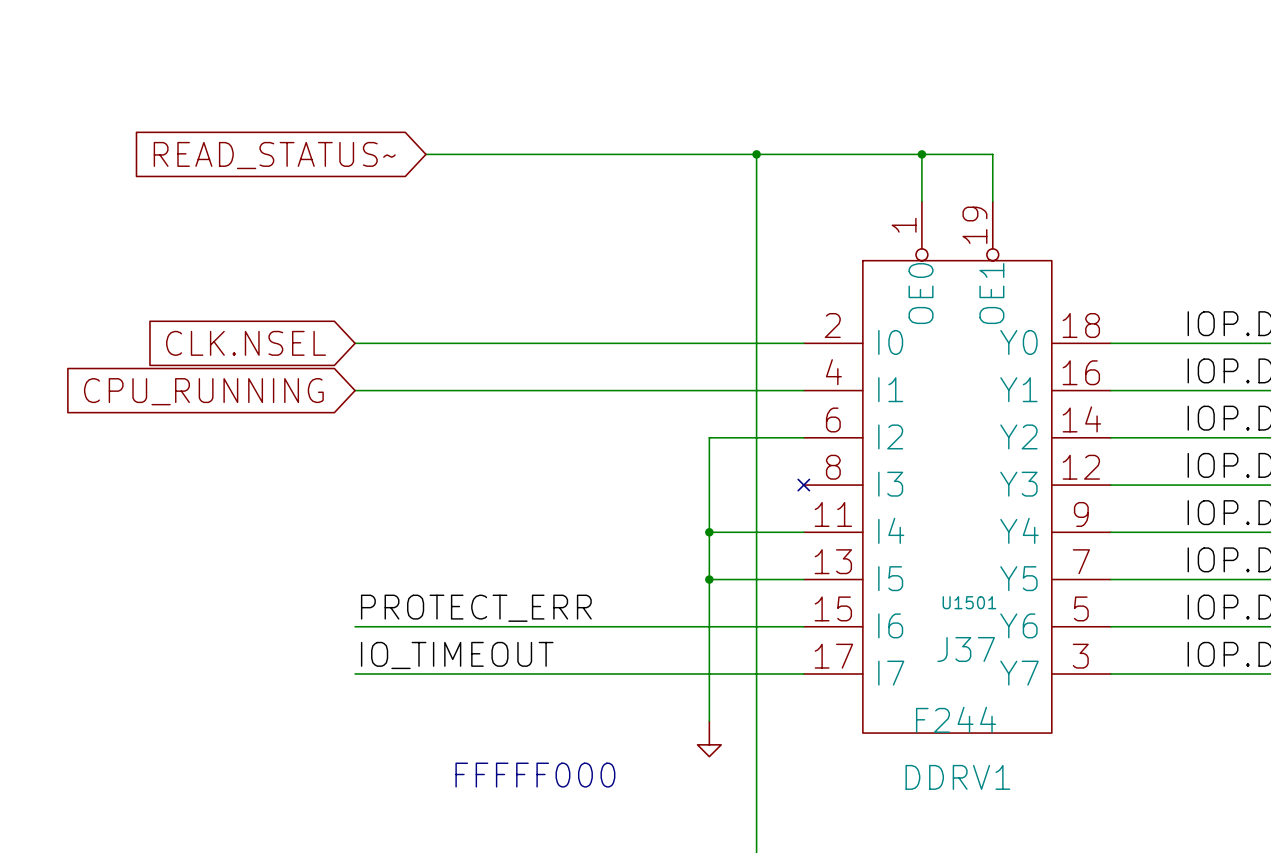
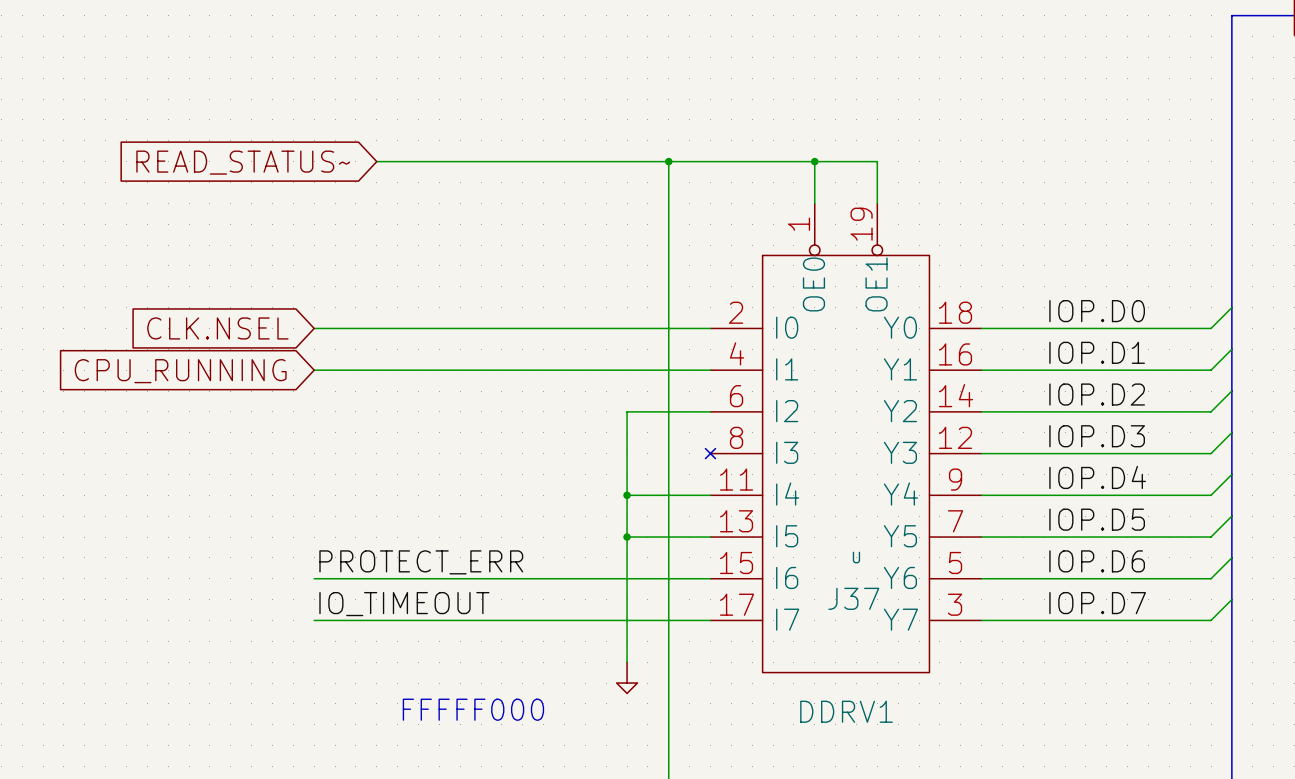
U1501 name: U1501 (969, 602) -> U (856, 557)
U1501 value: F244 (956, 719) -> none

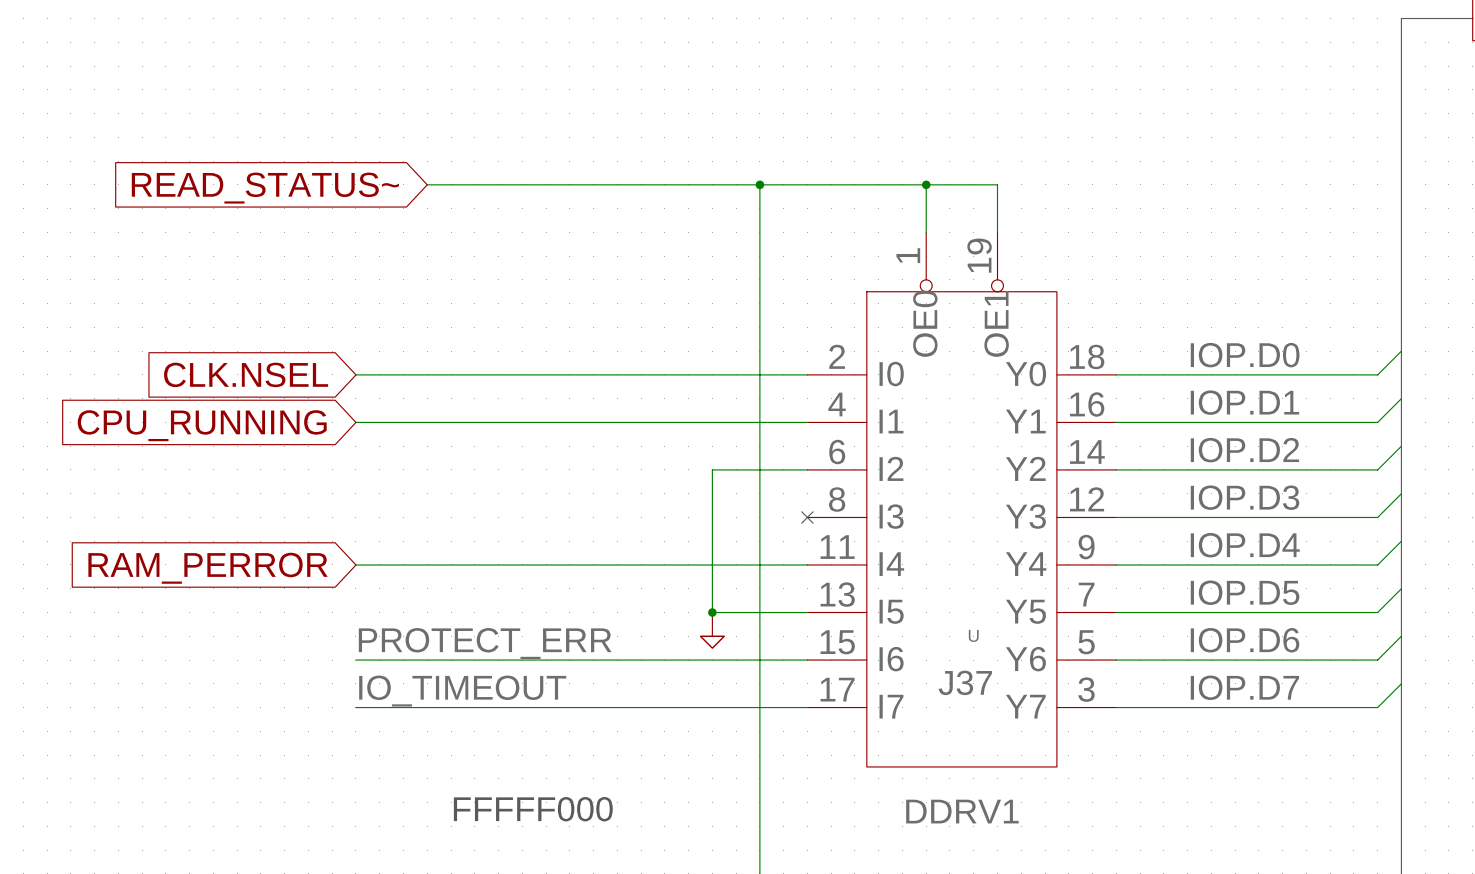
wire: none -> (355, 564) (712, 564)
junction: (627, 495) -> none
global label: none -> RAM_PERROR (208, 568)
wire: (627, 537) (627, 662) -> none
power symbol position: (627, 678) -> (712, 630)

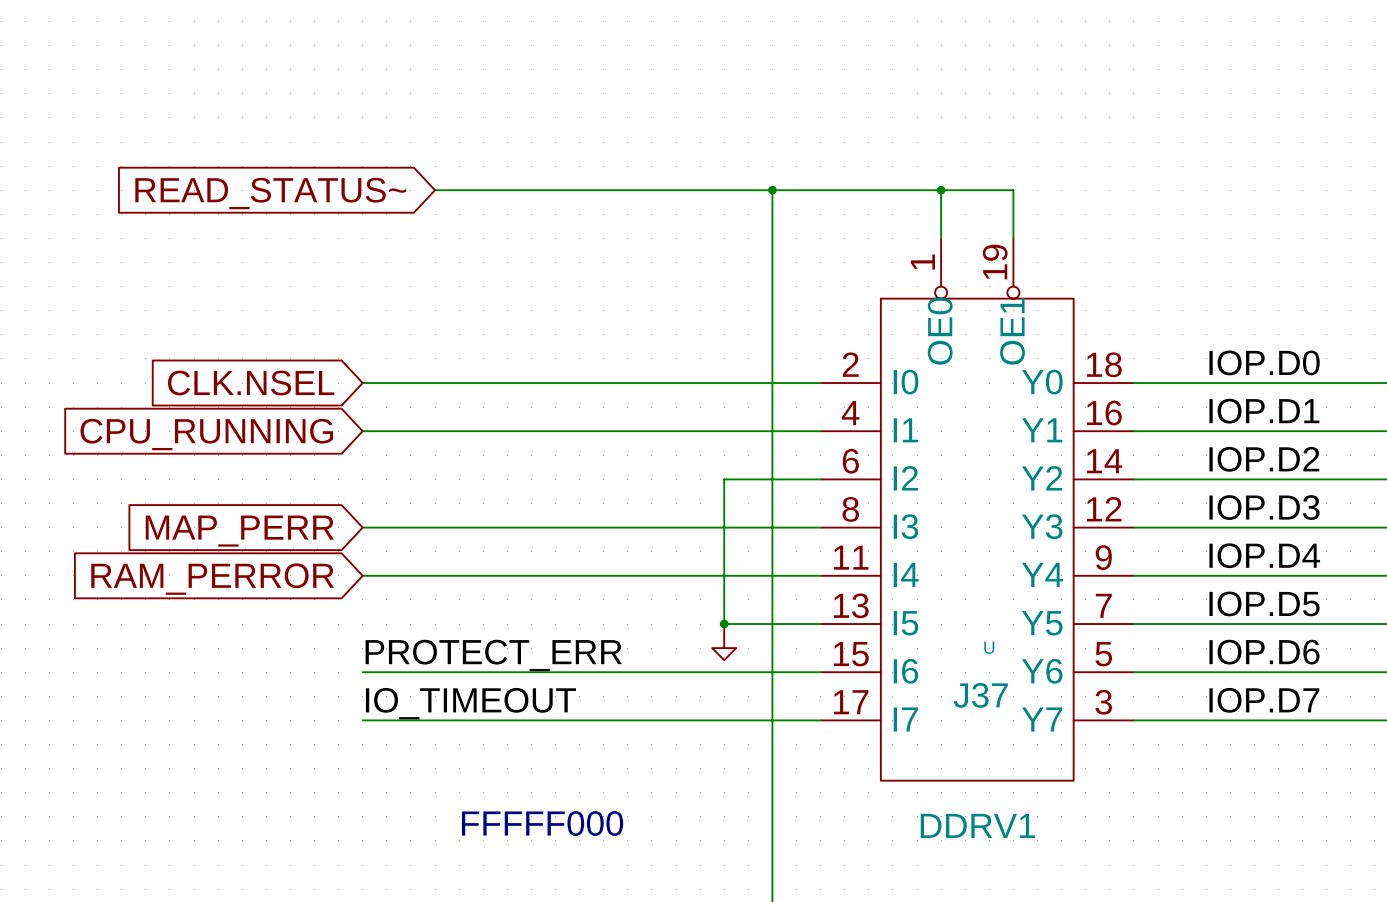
wire: none -> (362, 527) (820, 527)
no-connect mark: (807, 517) -> none
global label: none -> MAP_PERR (239, 531)

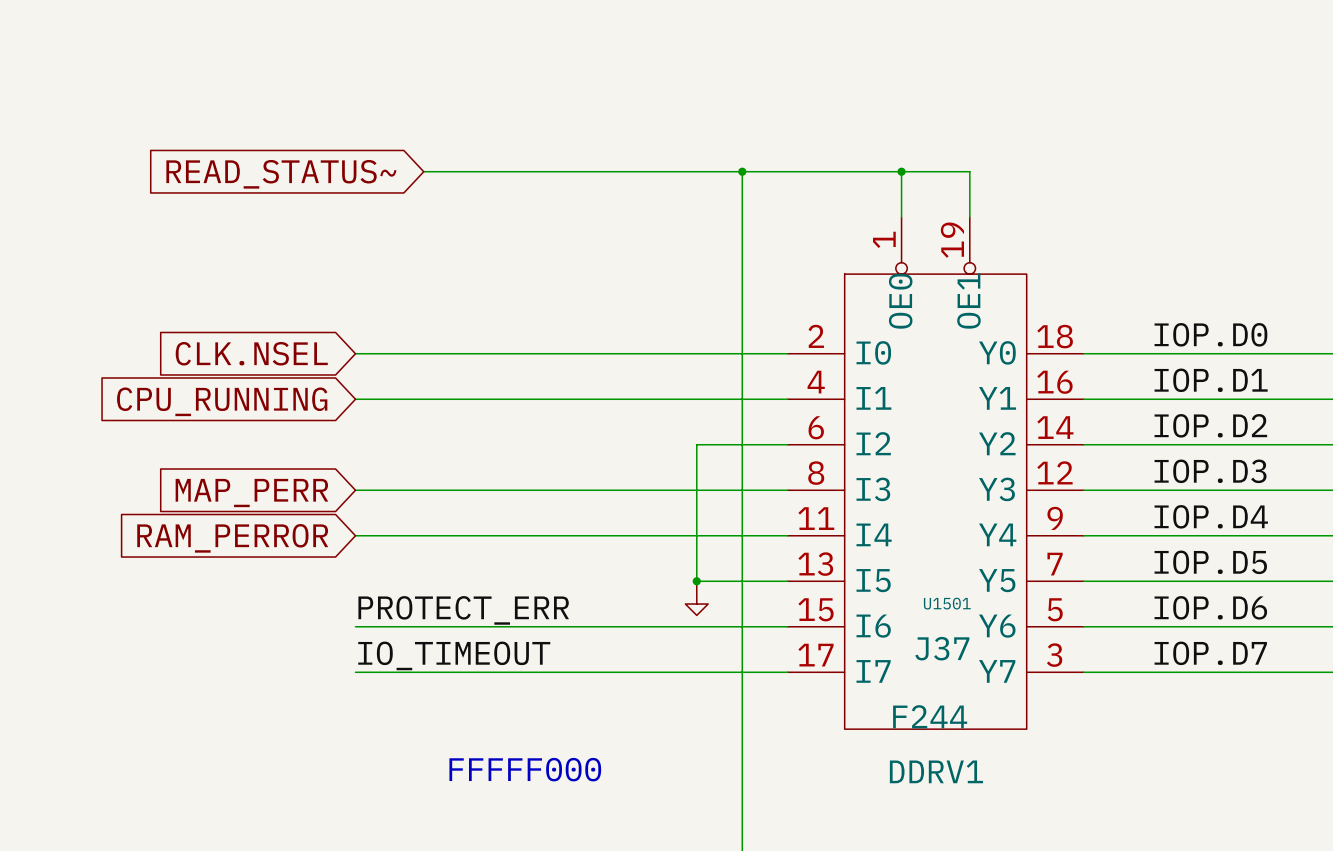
U name: U (989, 647) -> U1501 (947, 603)
U value: none -> F244 (930, 716)

